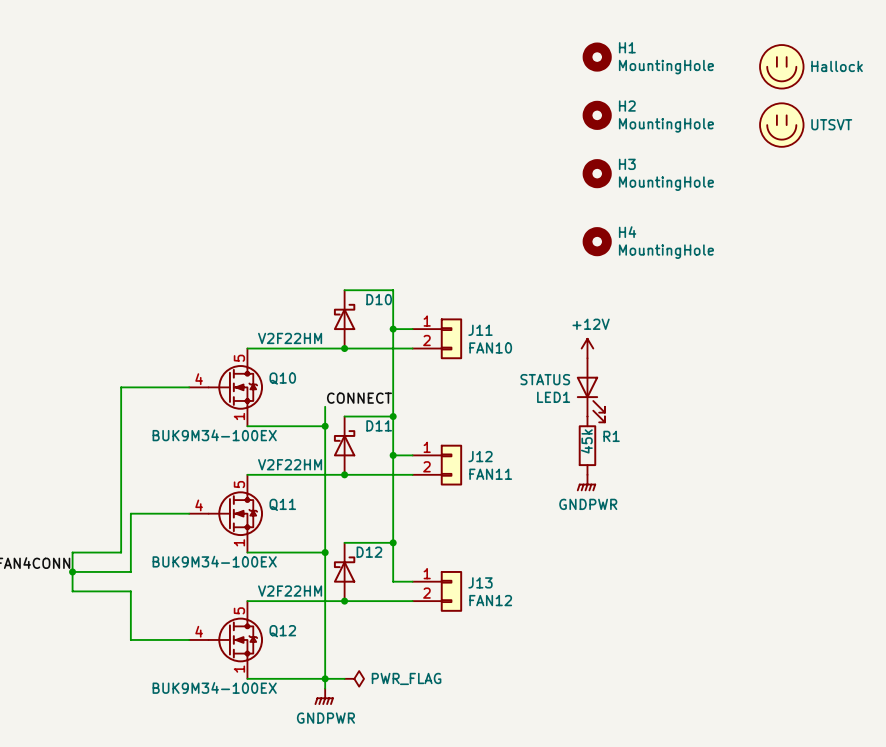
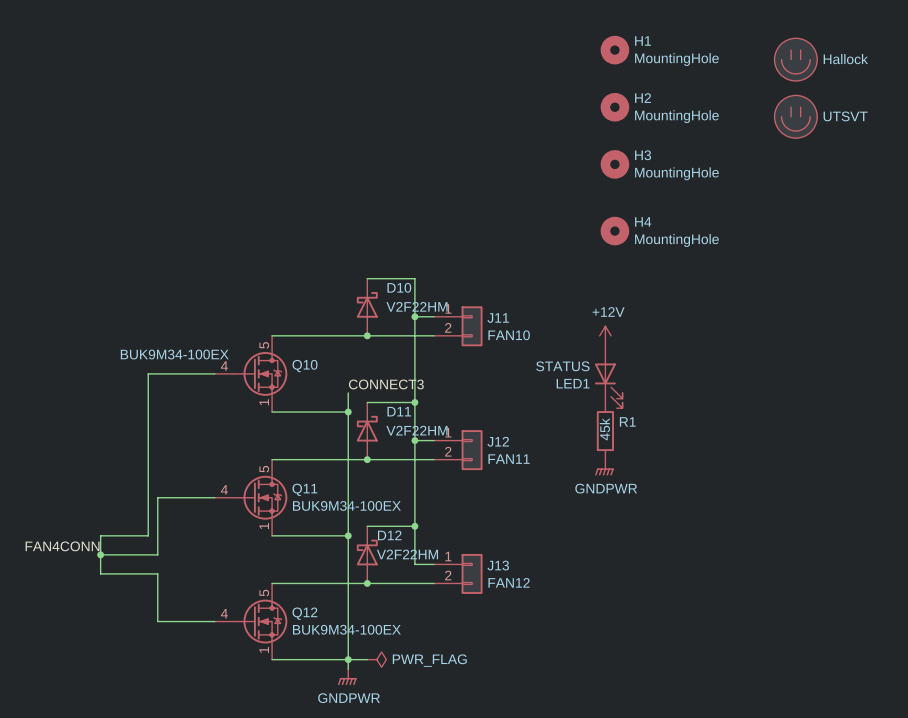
D10 value position: V2F22HM (290, 338) -> V2F22HM (416, 306)
label: CONNECT (359, 398) -> CONNECT3 (386, 384)
Q10 value position: BUK9M34-100EX (214, 435) -> BUK9M34-100EX (174, 354)
D11 value position: V2F22HM (290, 464) -> V2F22HM (416, 430)
Q11 value position: BUK9M34-100EX (214, 561) -> BUK9M34-100EX (346, 505)
D12 value position: V2F22HM (290, 591) -> V2F22HM (407, 554)
Q12 value position: BUK9M34-100EX (214, 687) -> BUK9M34-100EX (346, 629)

